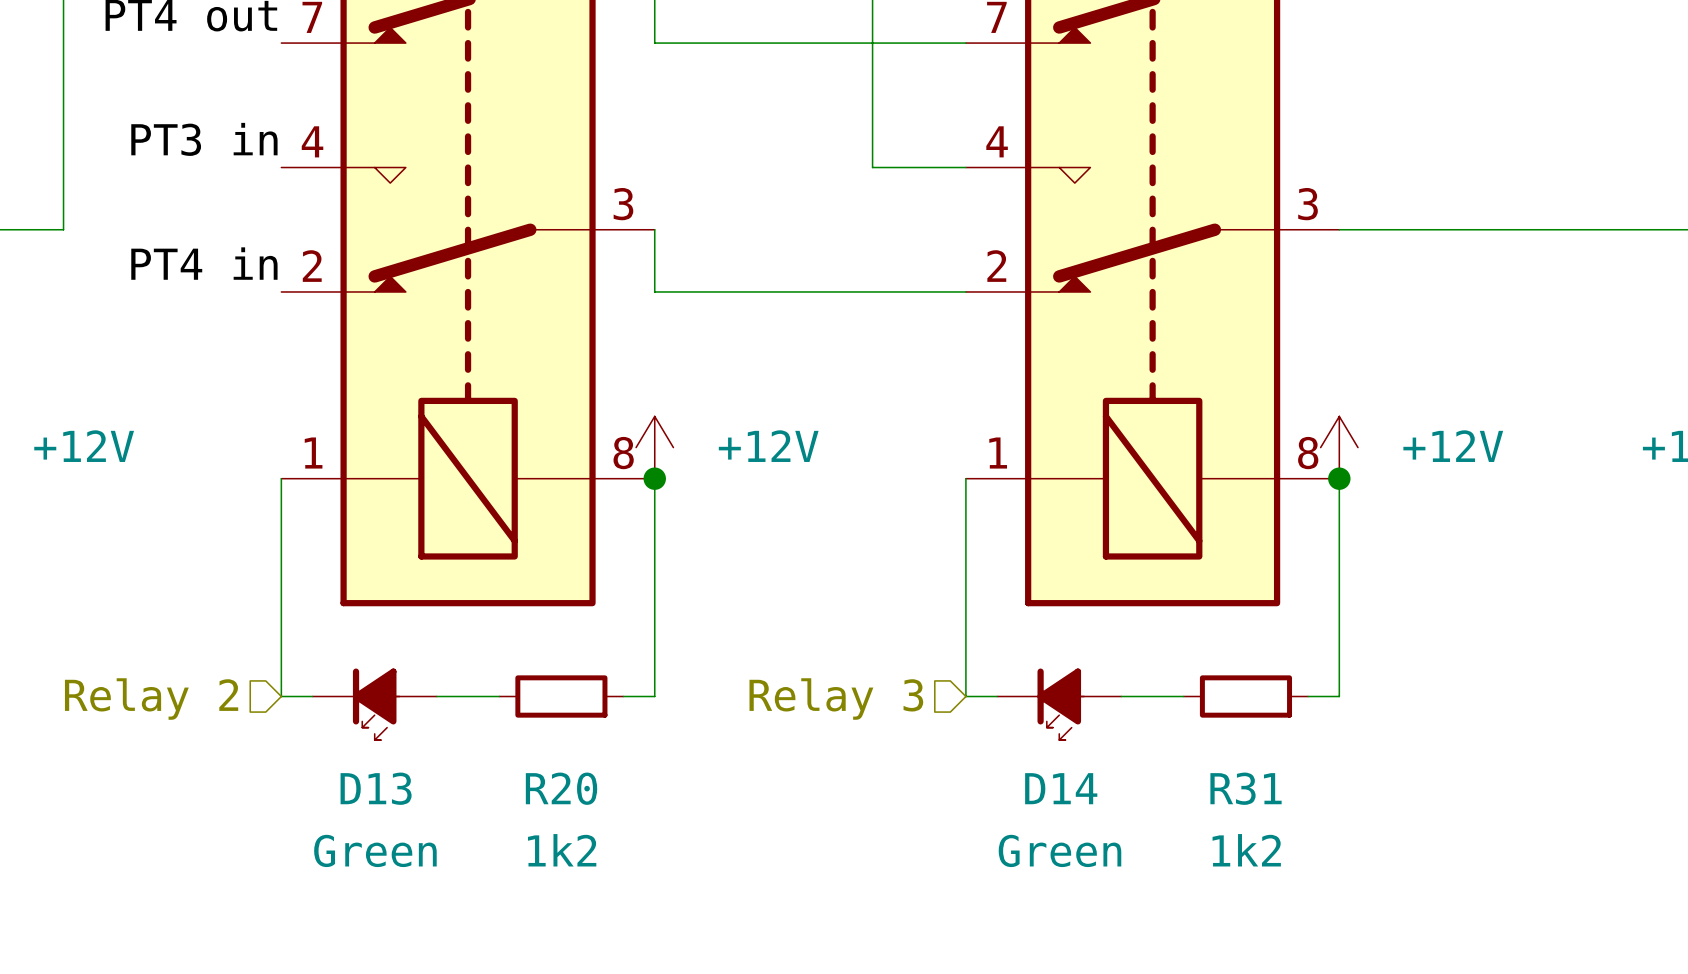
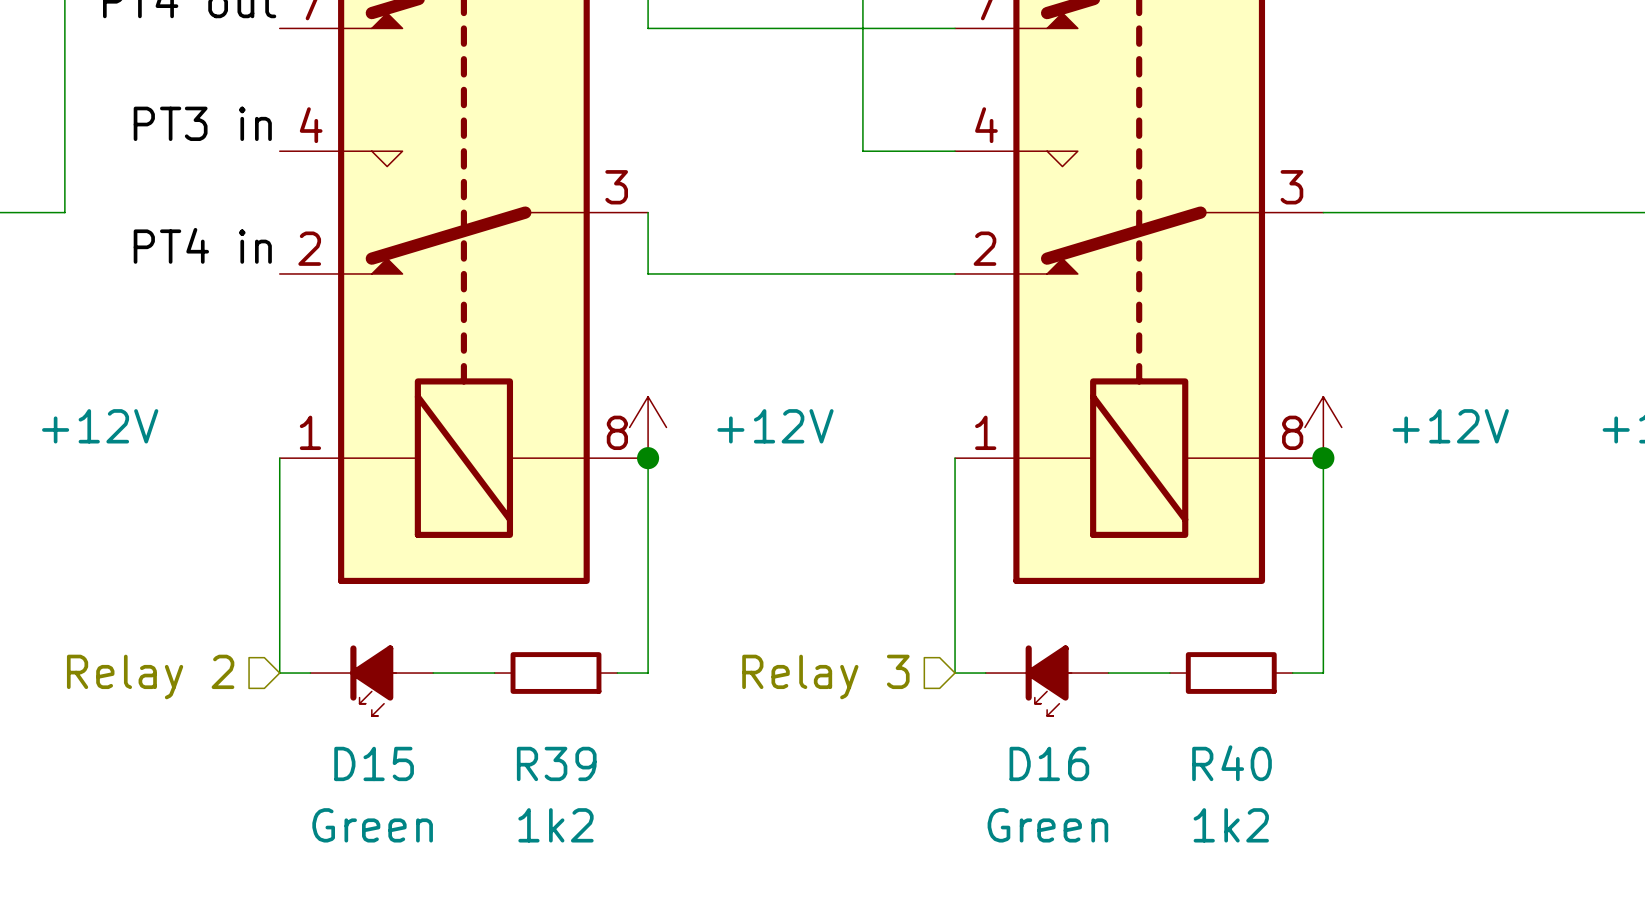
D13 name: D13 (376, 788) -> D15 (374, 763)
R20 name: R20 (561, 788) -> R39 (556, 763)
D14 name: D14 (1061, 788) -> D16 (1049, 763)
R31 name: R31 (1246, 788) -> R40 (1232, 763)

